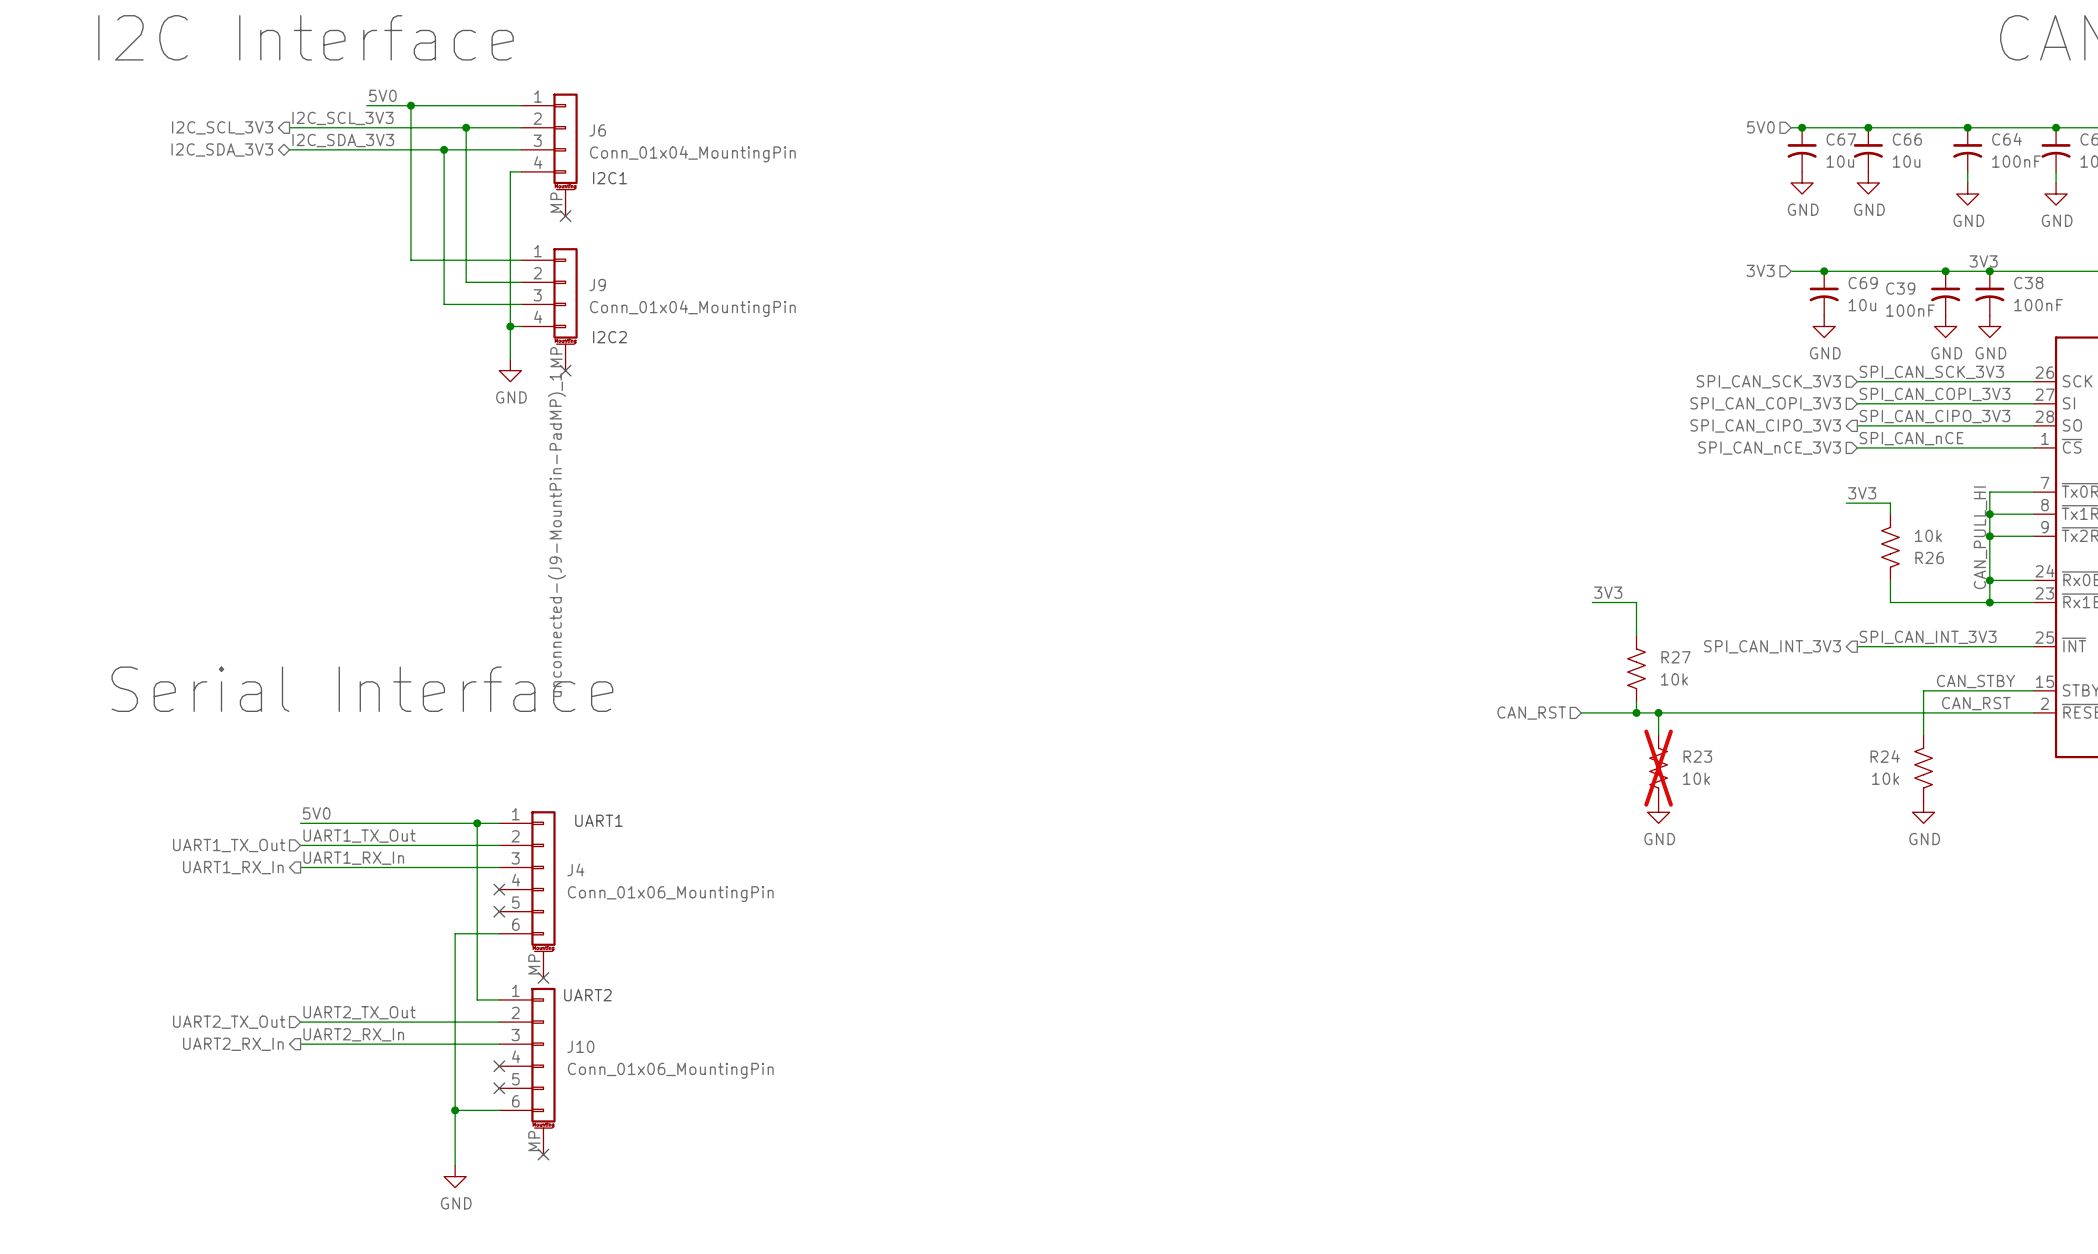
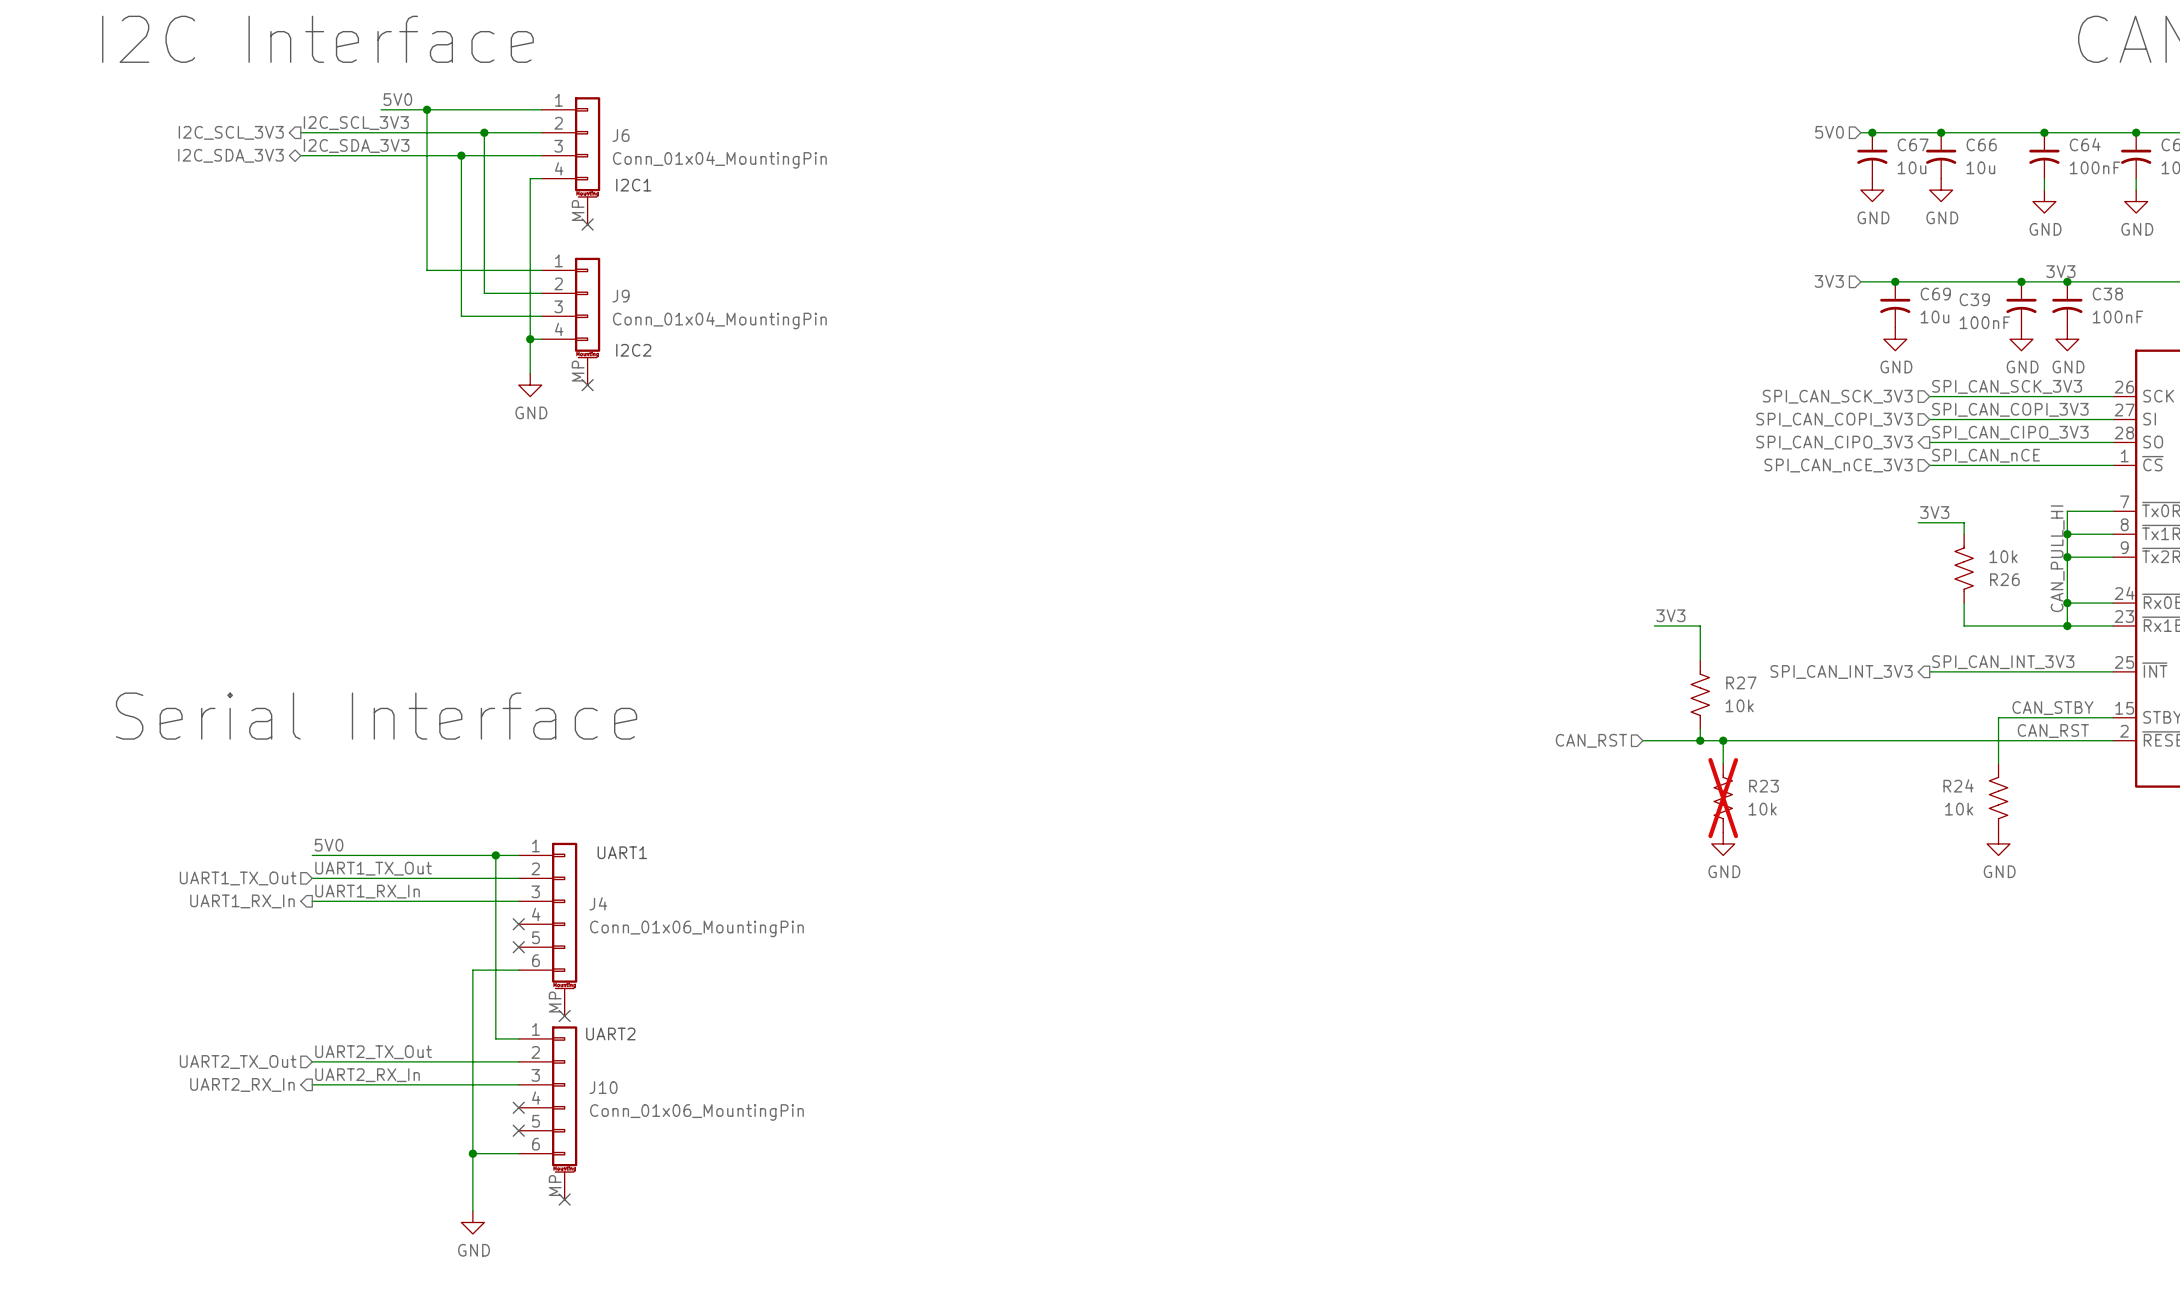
label: unconnected-(J9-MountPin-PadMP)_1 (557, 535) -> none

